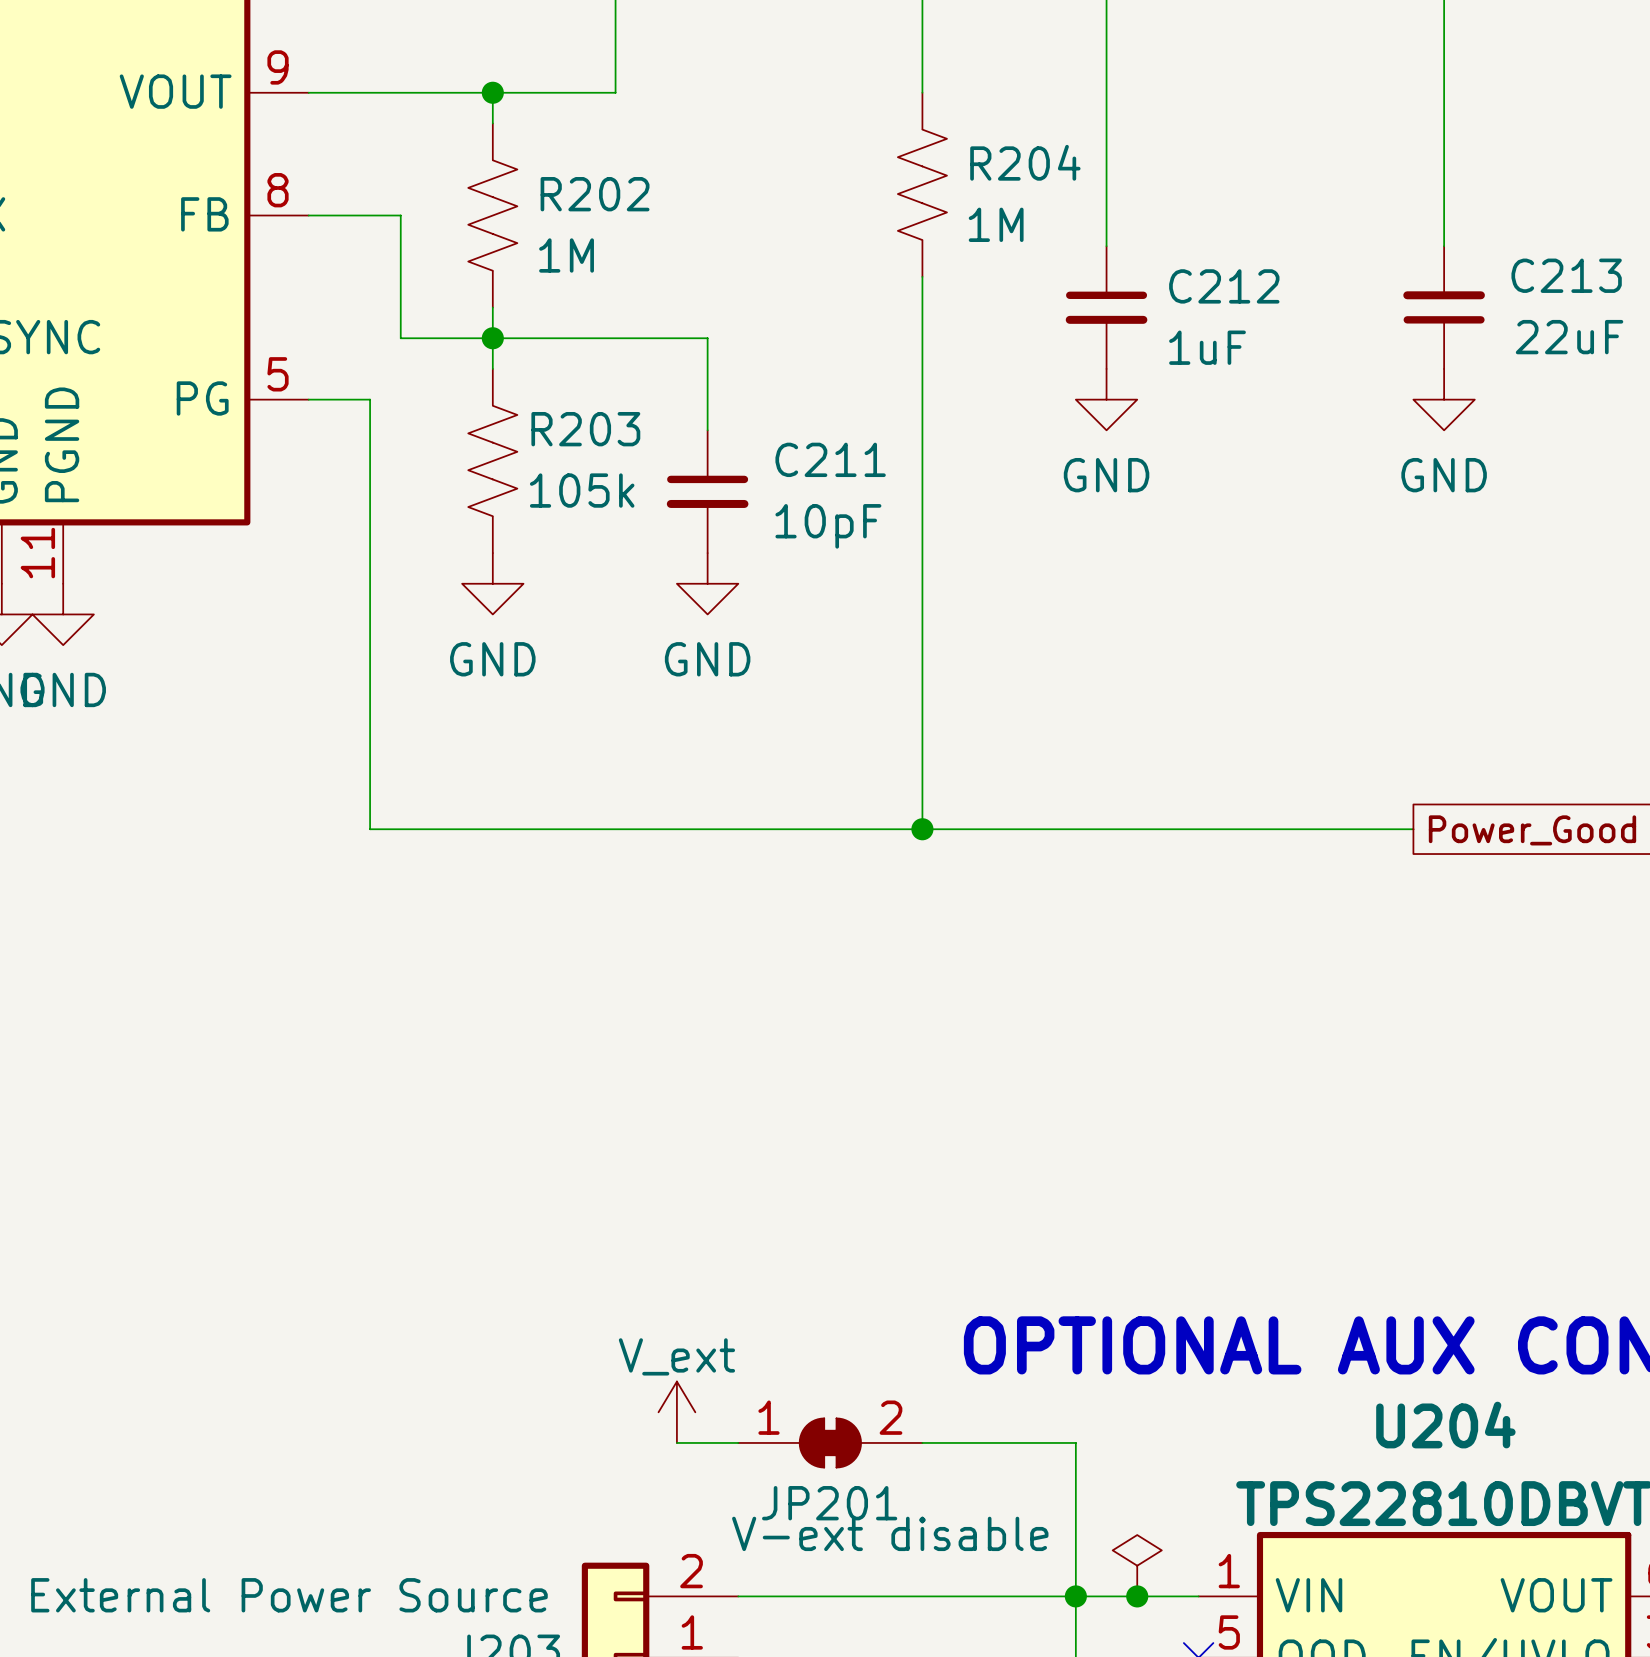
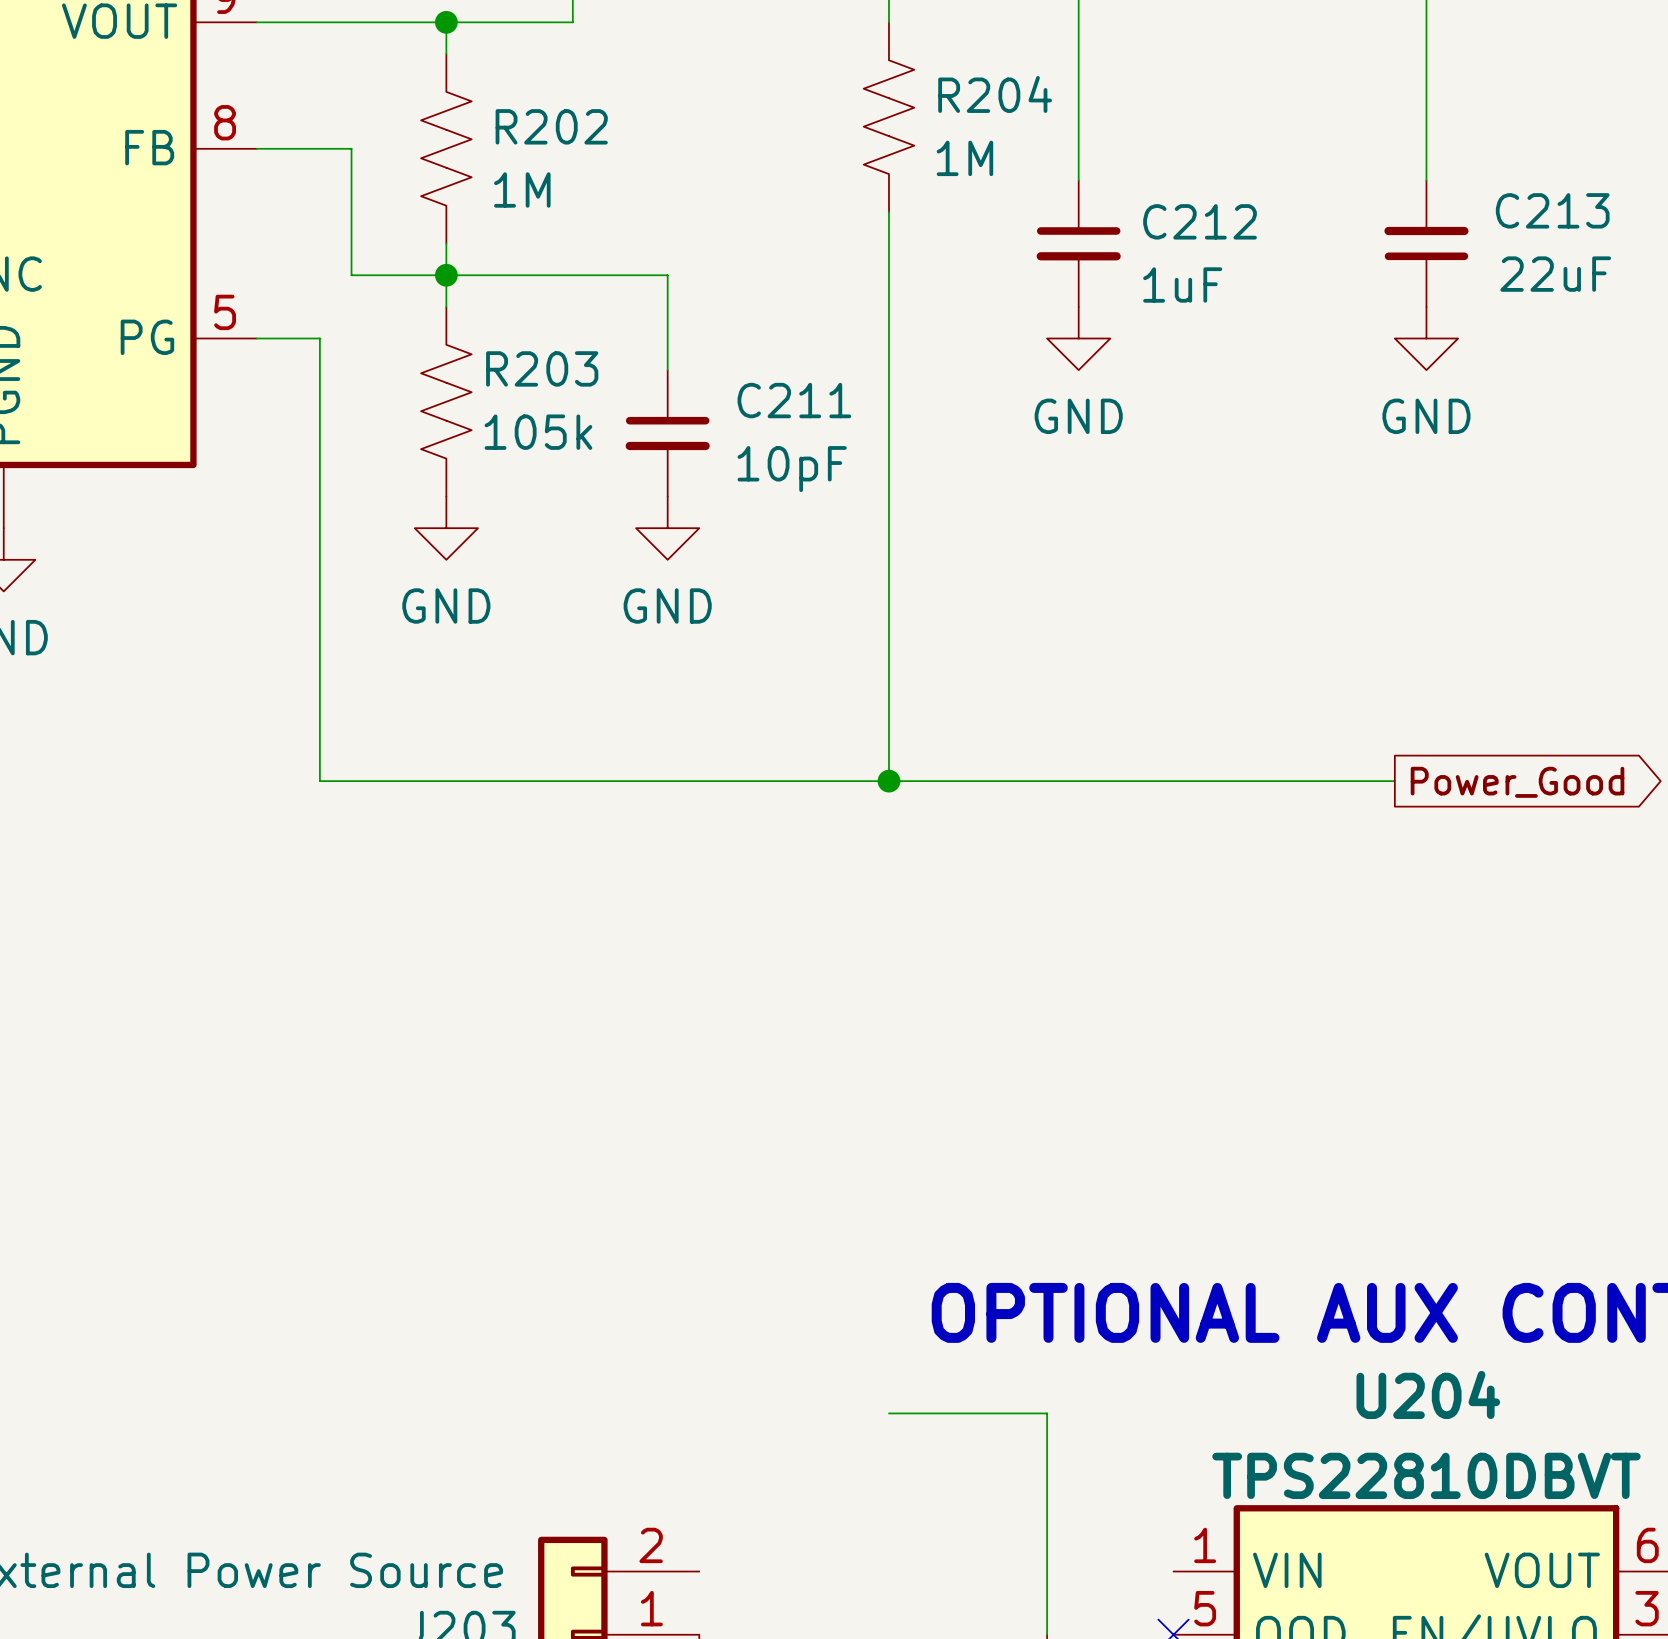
power symbol: V_ext (676, 1412) -> none
wire: (676, 1442) (738, 1442) -> none
JP201: V-ext disable (830, 1442) -> none
power symbol: (1137, 1565) -> none
wire: (738, 1596) (1198, 1596) -> none
junction: (1075, 1596) -> none
junction: (1137, 1596) -> none

